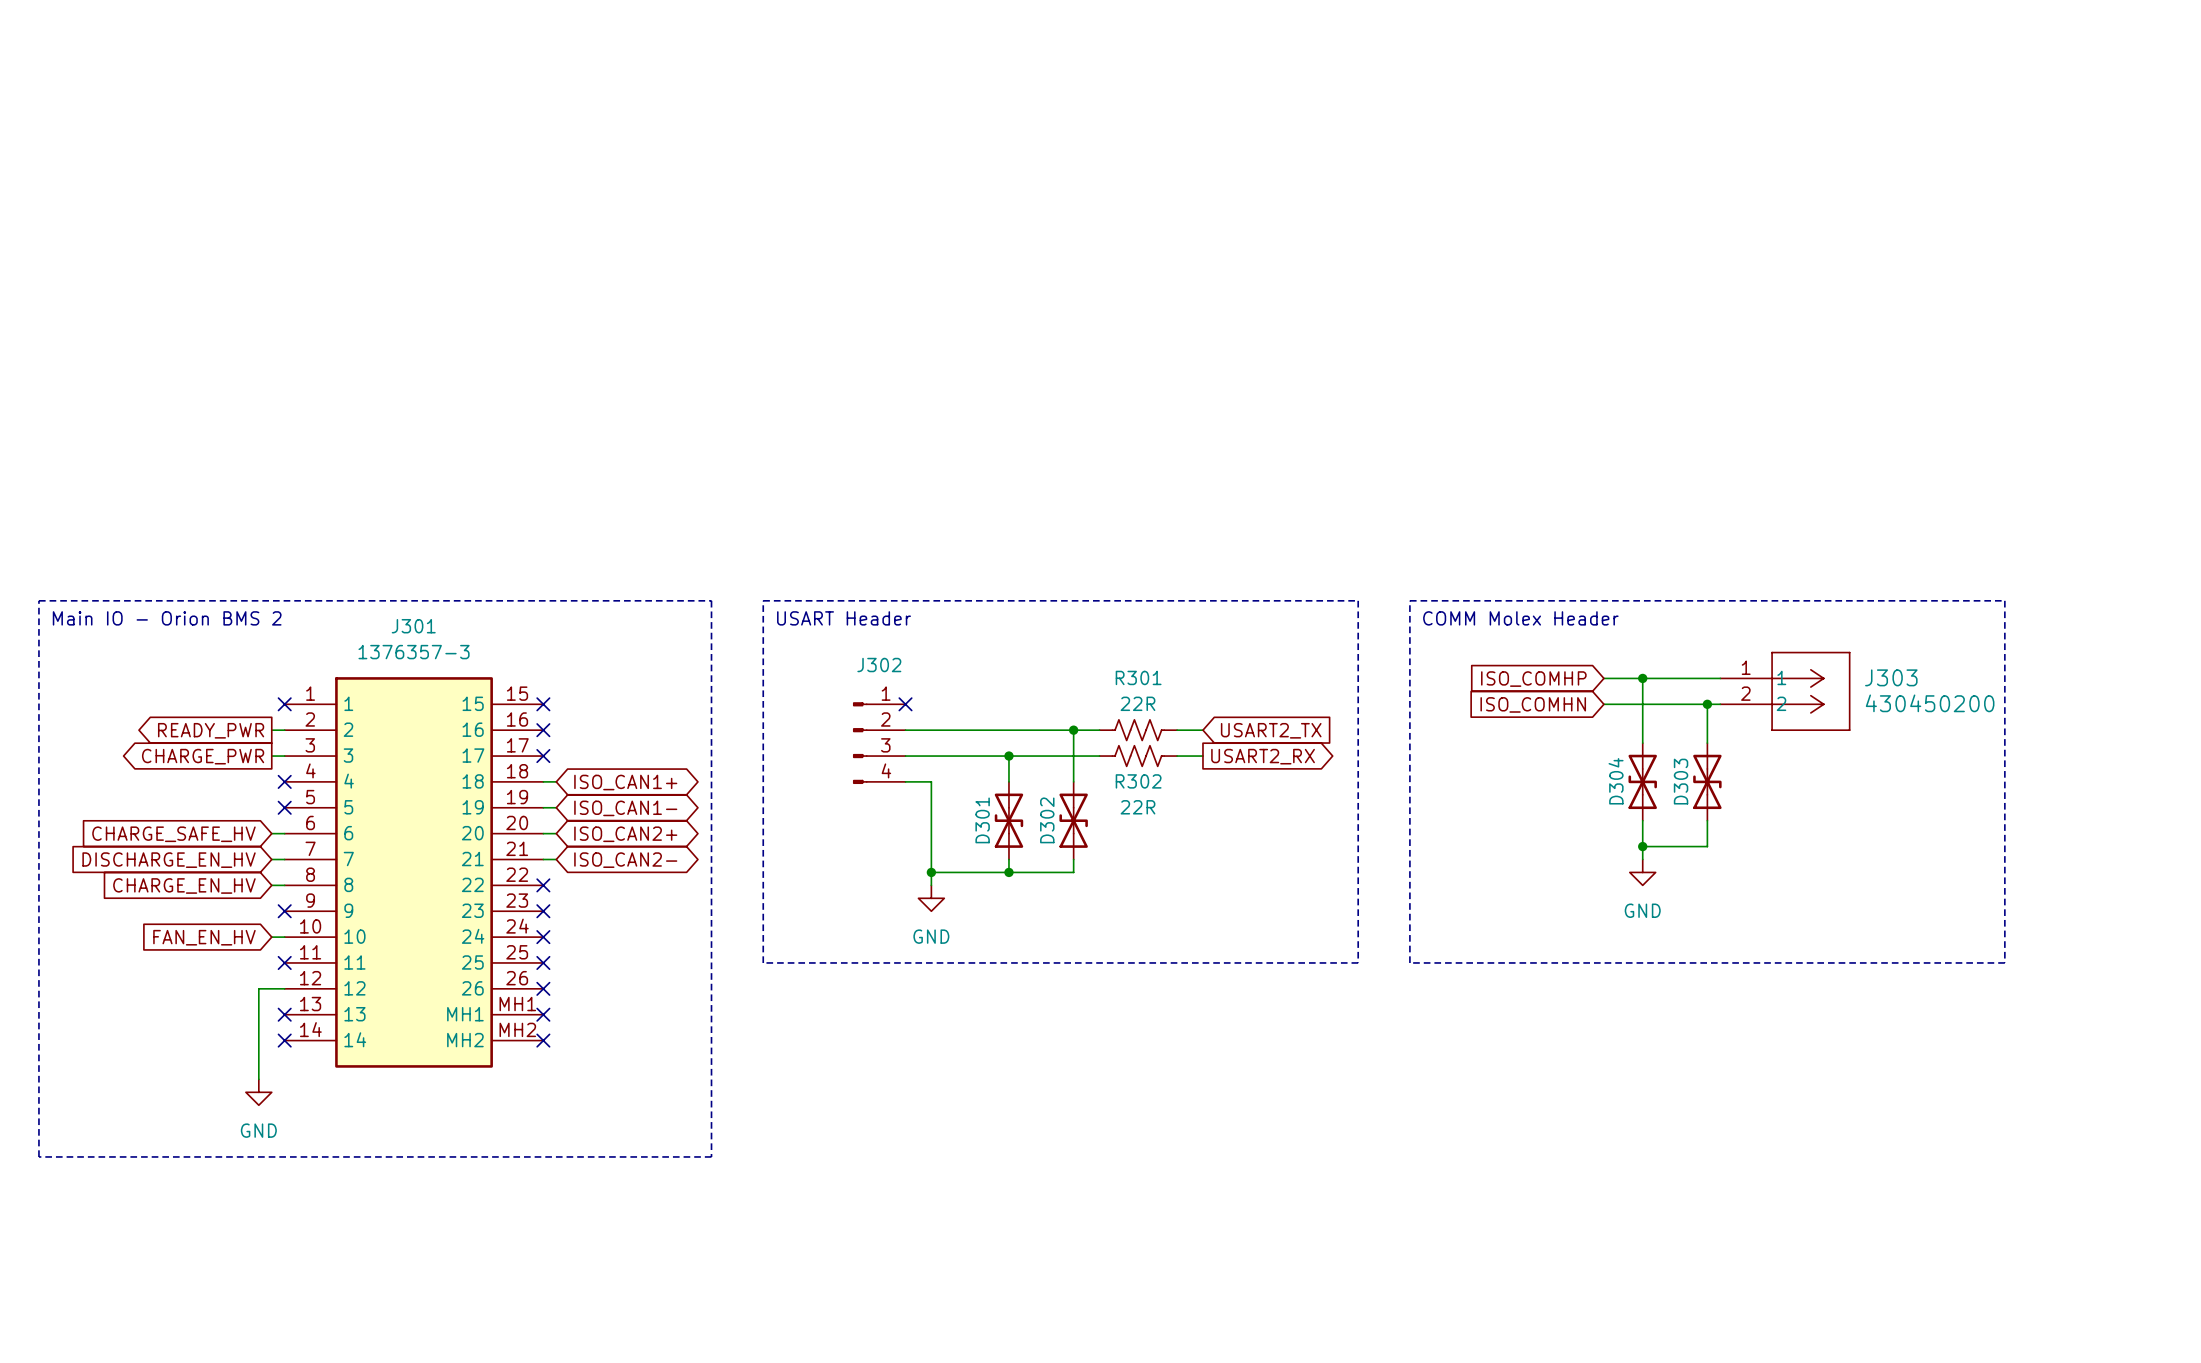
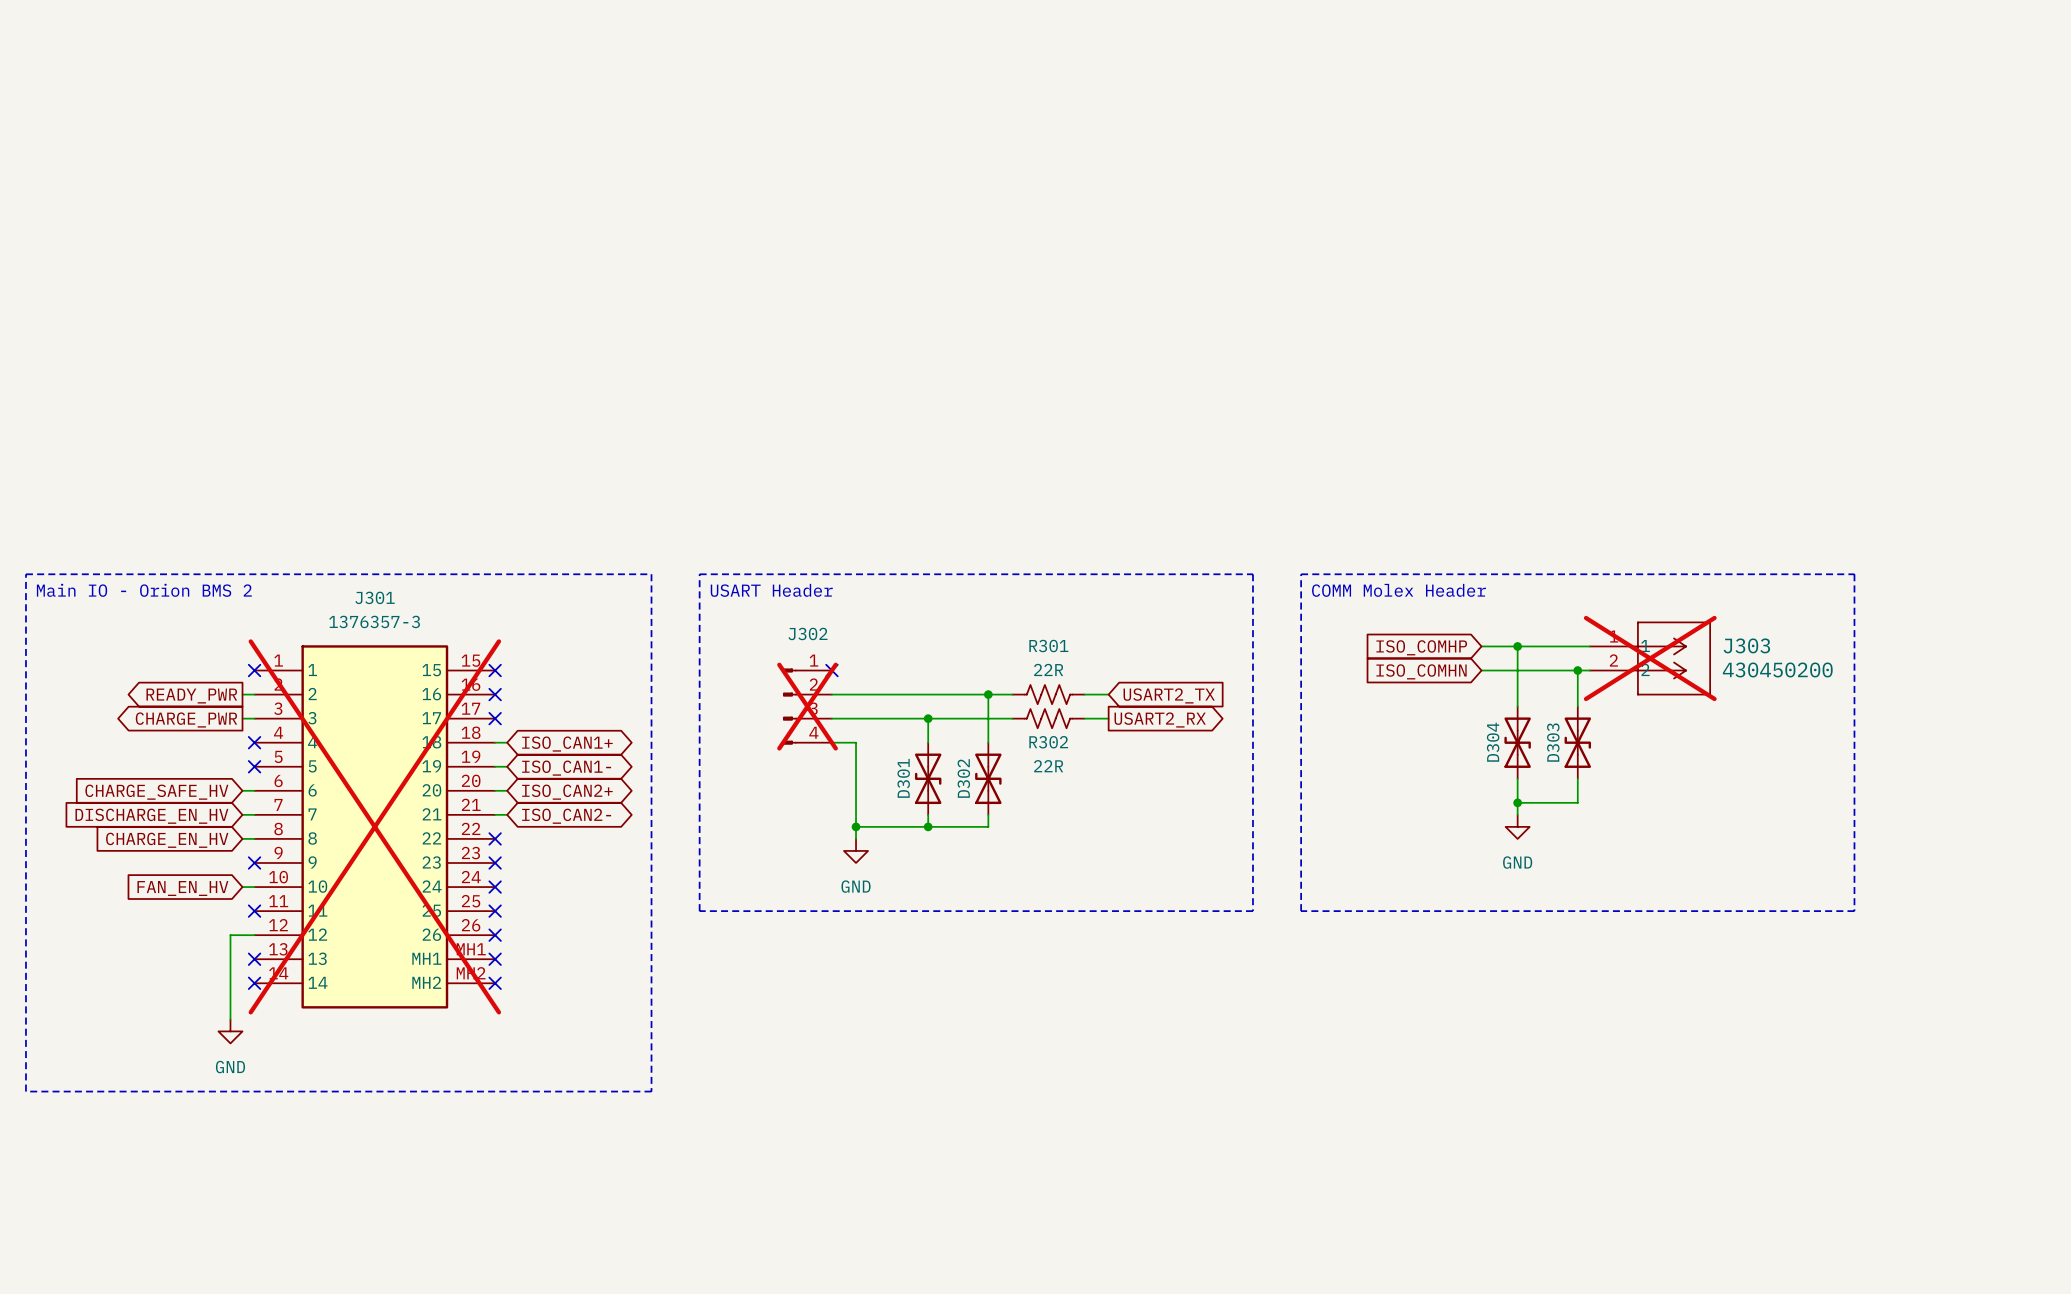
J303 do-not-place cross: none -> (1650, 658)
J302 do-not-place cross: none -> (807, 706)
J301 do-not-place cross: none -> (374, 826)

